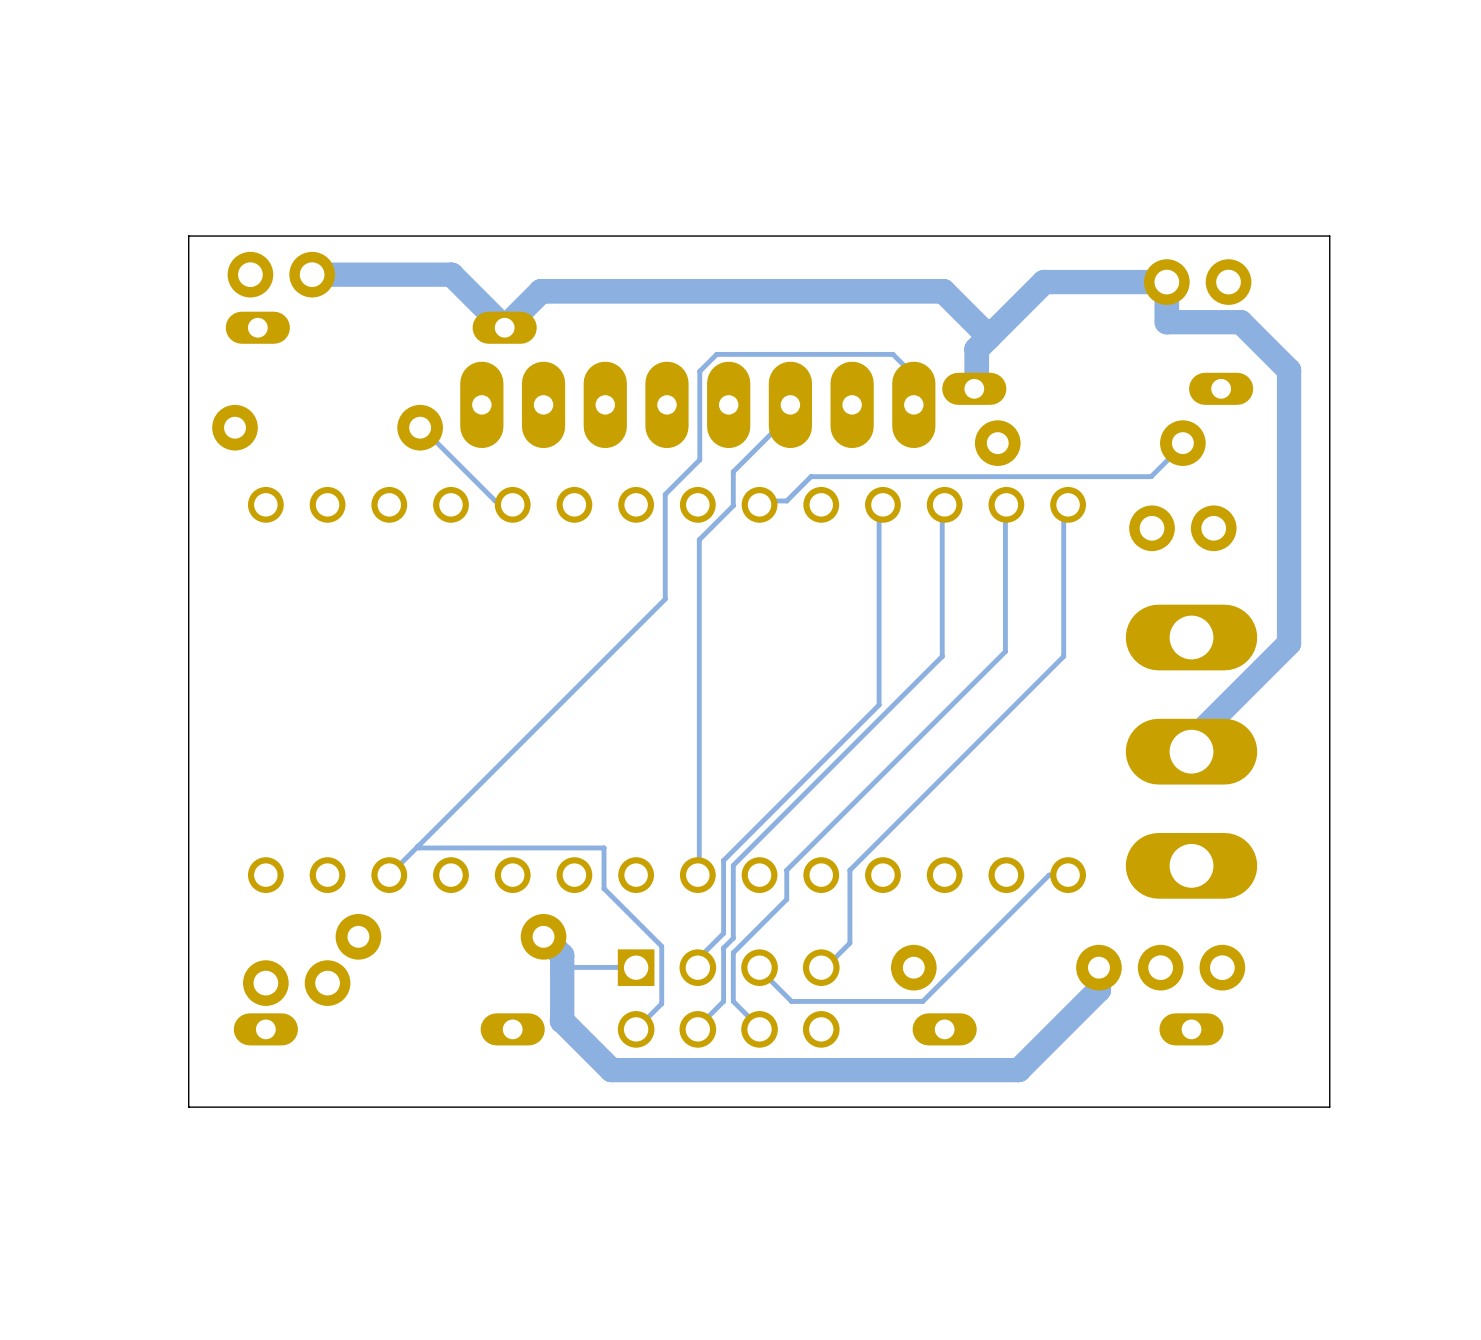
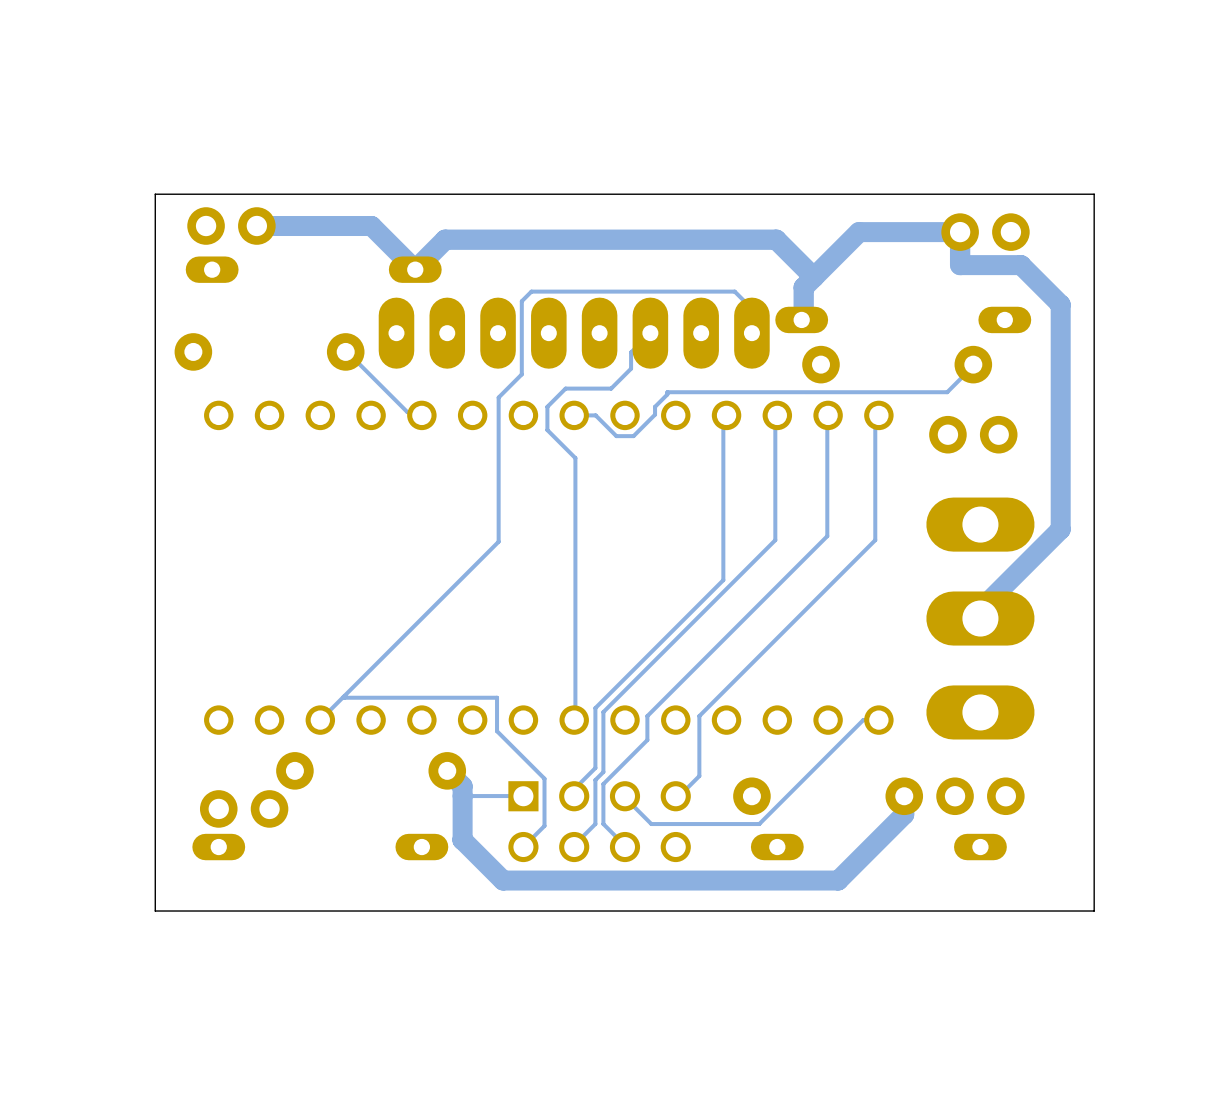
track: (716, 354) (699, 371) (699, 459) (687, 472) -> (589, 291) (531, 291) (521, 301) (521, 374) (498, 397) (498, 541)
track: (790, 404) (795, 409) (733, 471) (733, 505) (699, 539) (699, 556) -> (650, 333) (631, 352) (631, 368) (611, 388) (565, 388)
track: (811, 476) (786, 500) (762, 500) (759, 504) -> (667, 392) (655, 406) (655, 414) (633, 436) (616, 436) (595, 415) (574, 415)
track: (665, 522) (665, 599) (606, 658) -> (547, 430) (575, 458)

